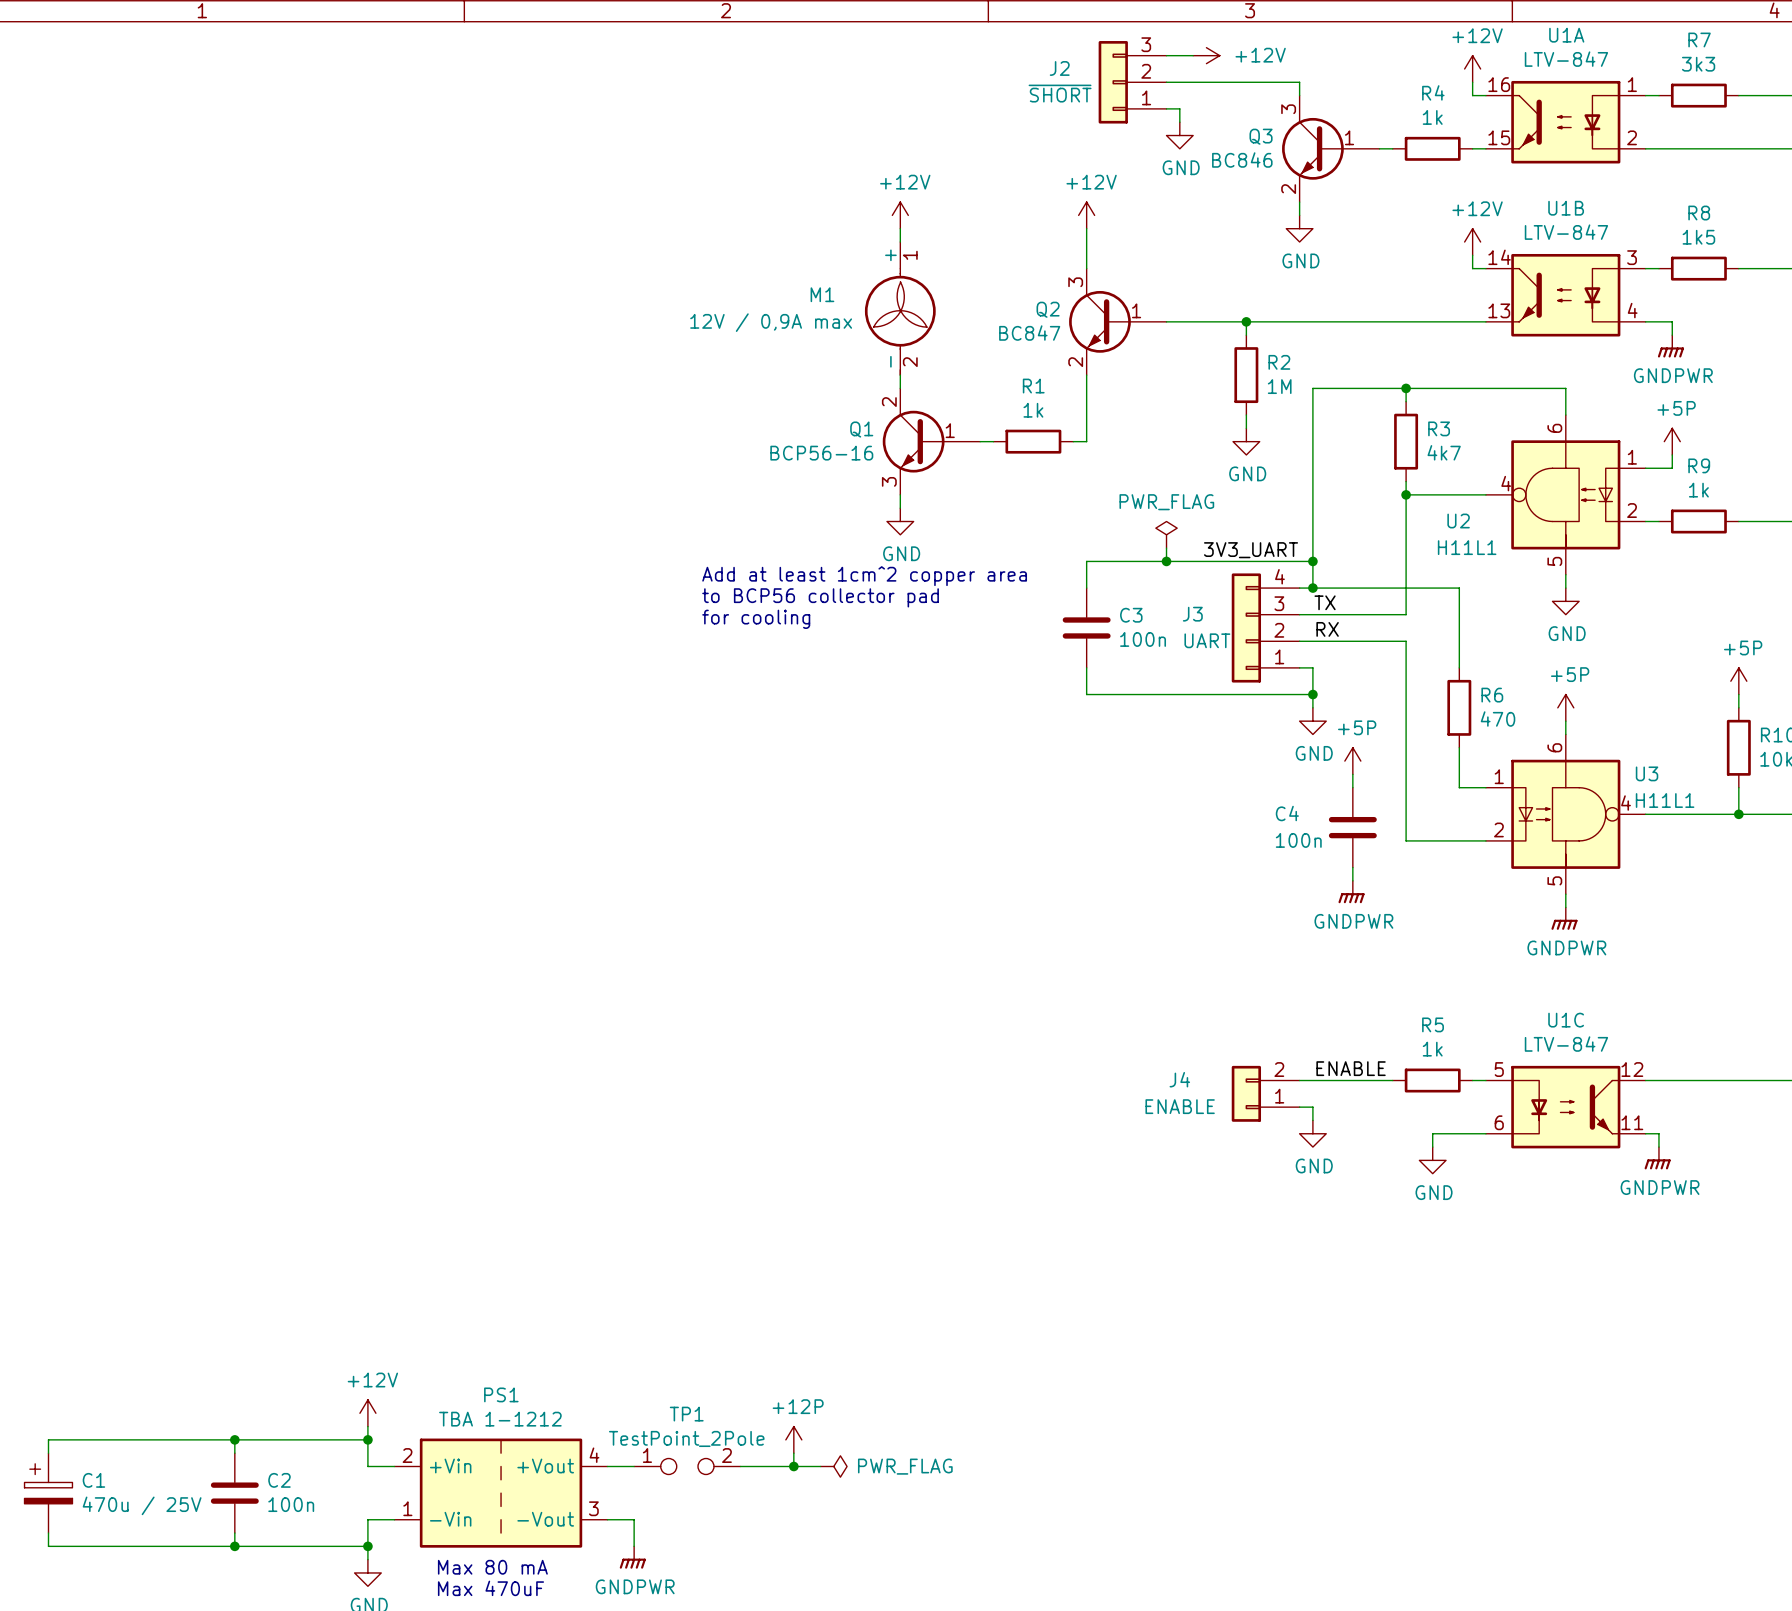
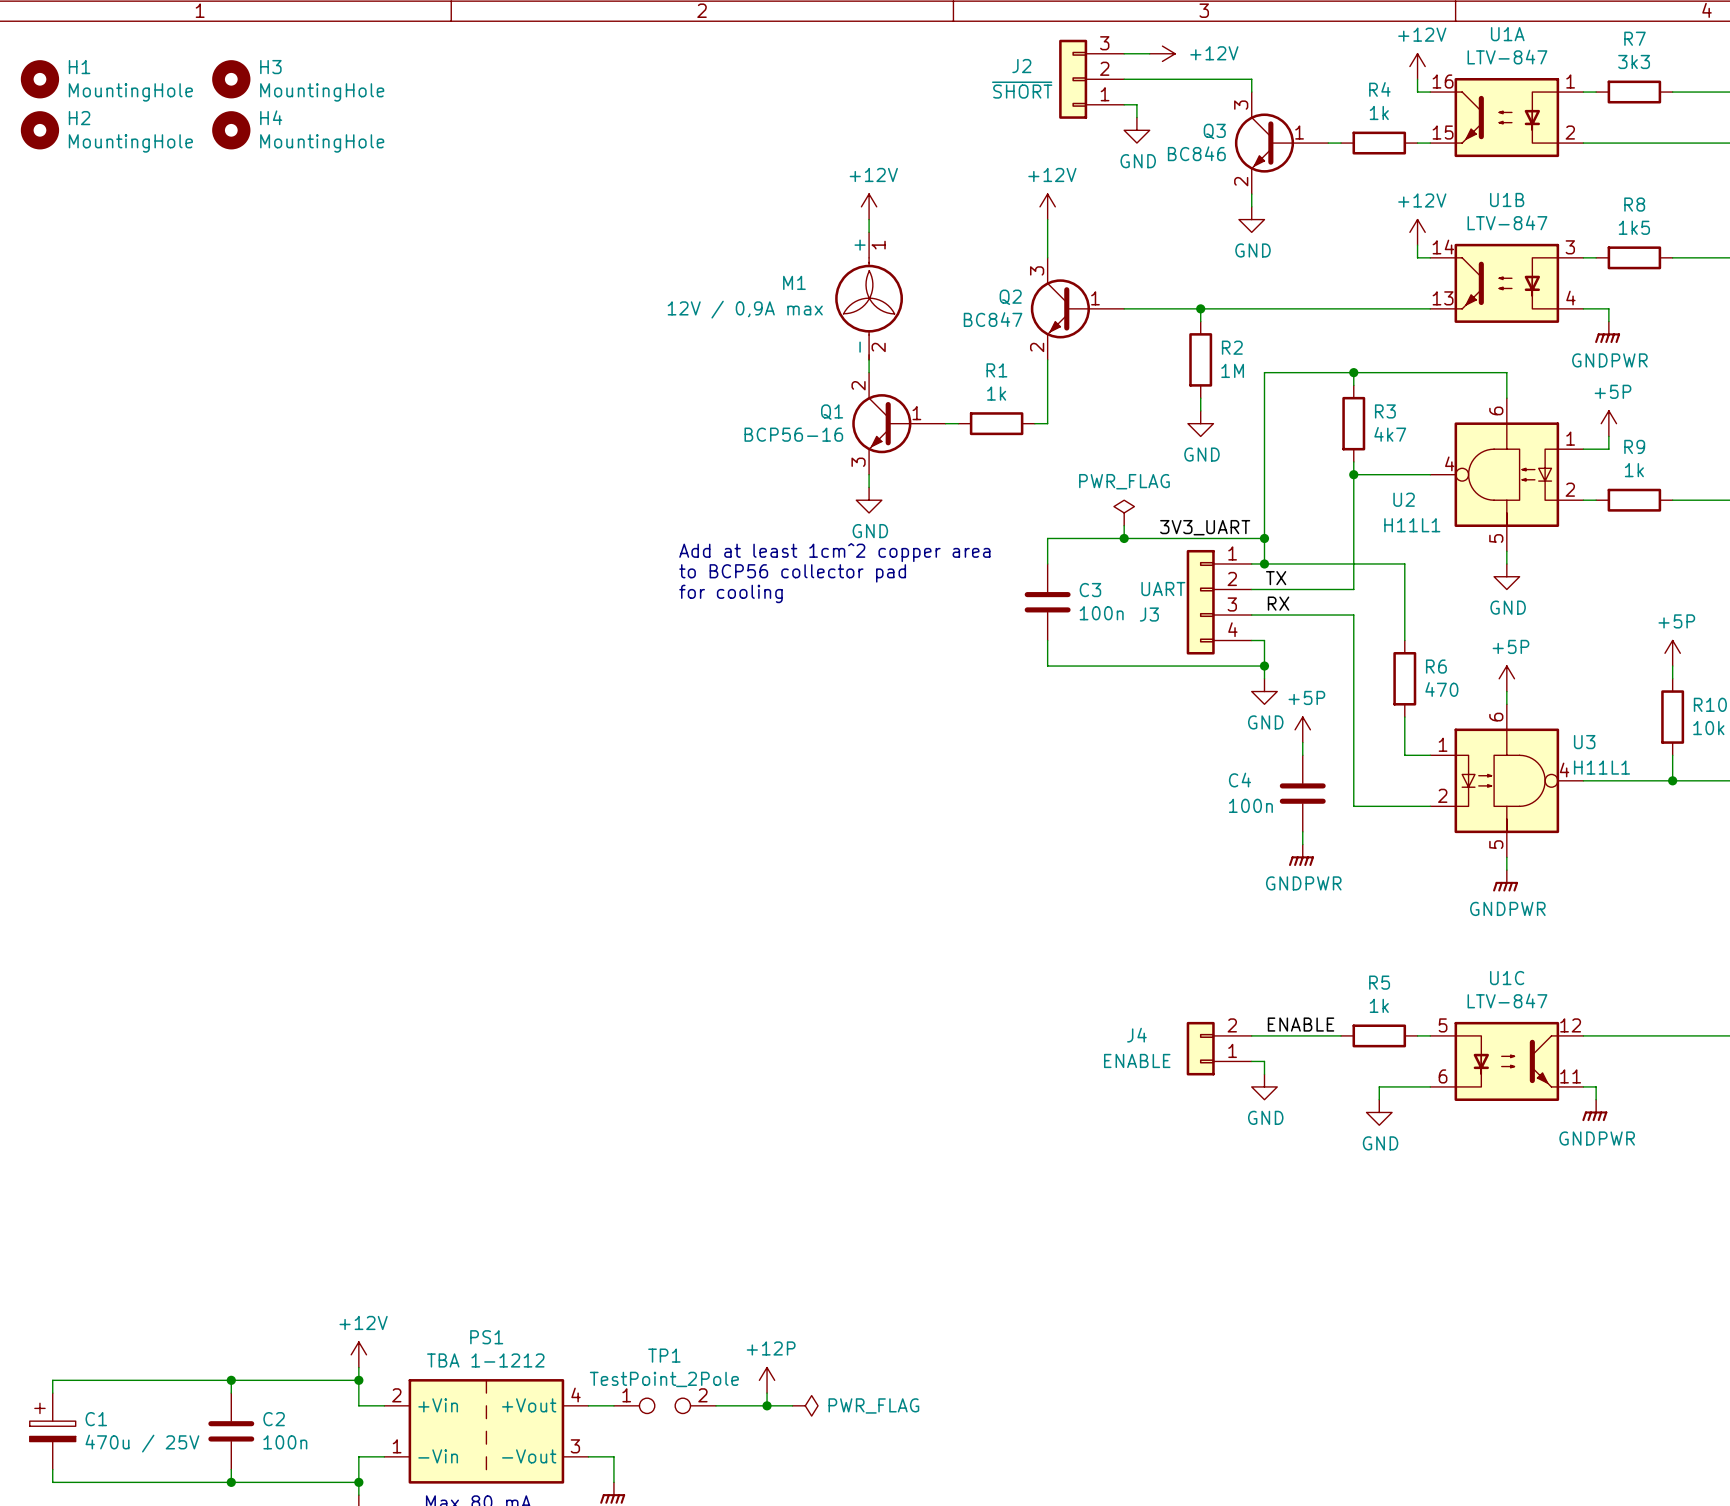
H1: none -> MountingHole (39, 79)
H3: none -> MountingHole (231, 79)
H2: none -> MountingHole (39, 130)
H4: none -> MountingHole (231, 130)
J3 flip: as is (1246, 627) -> up-down (1200, 602)

